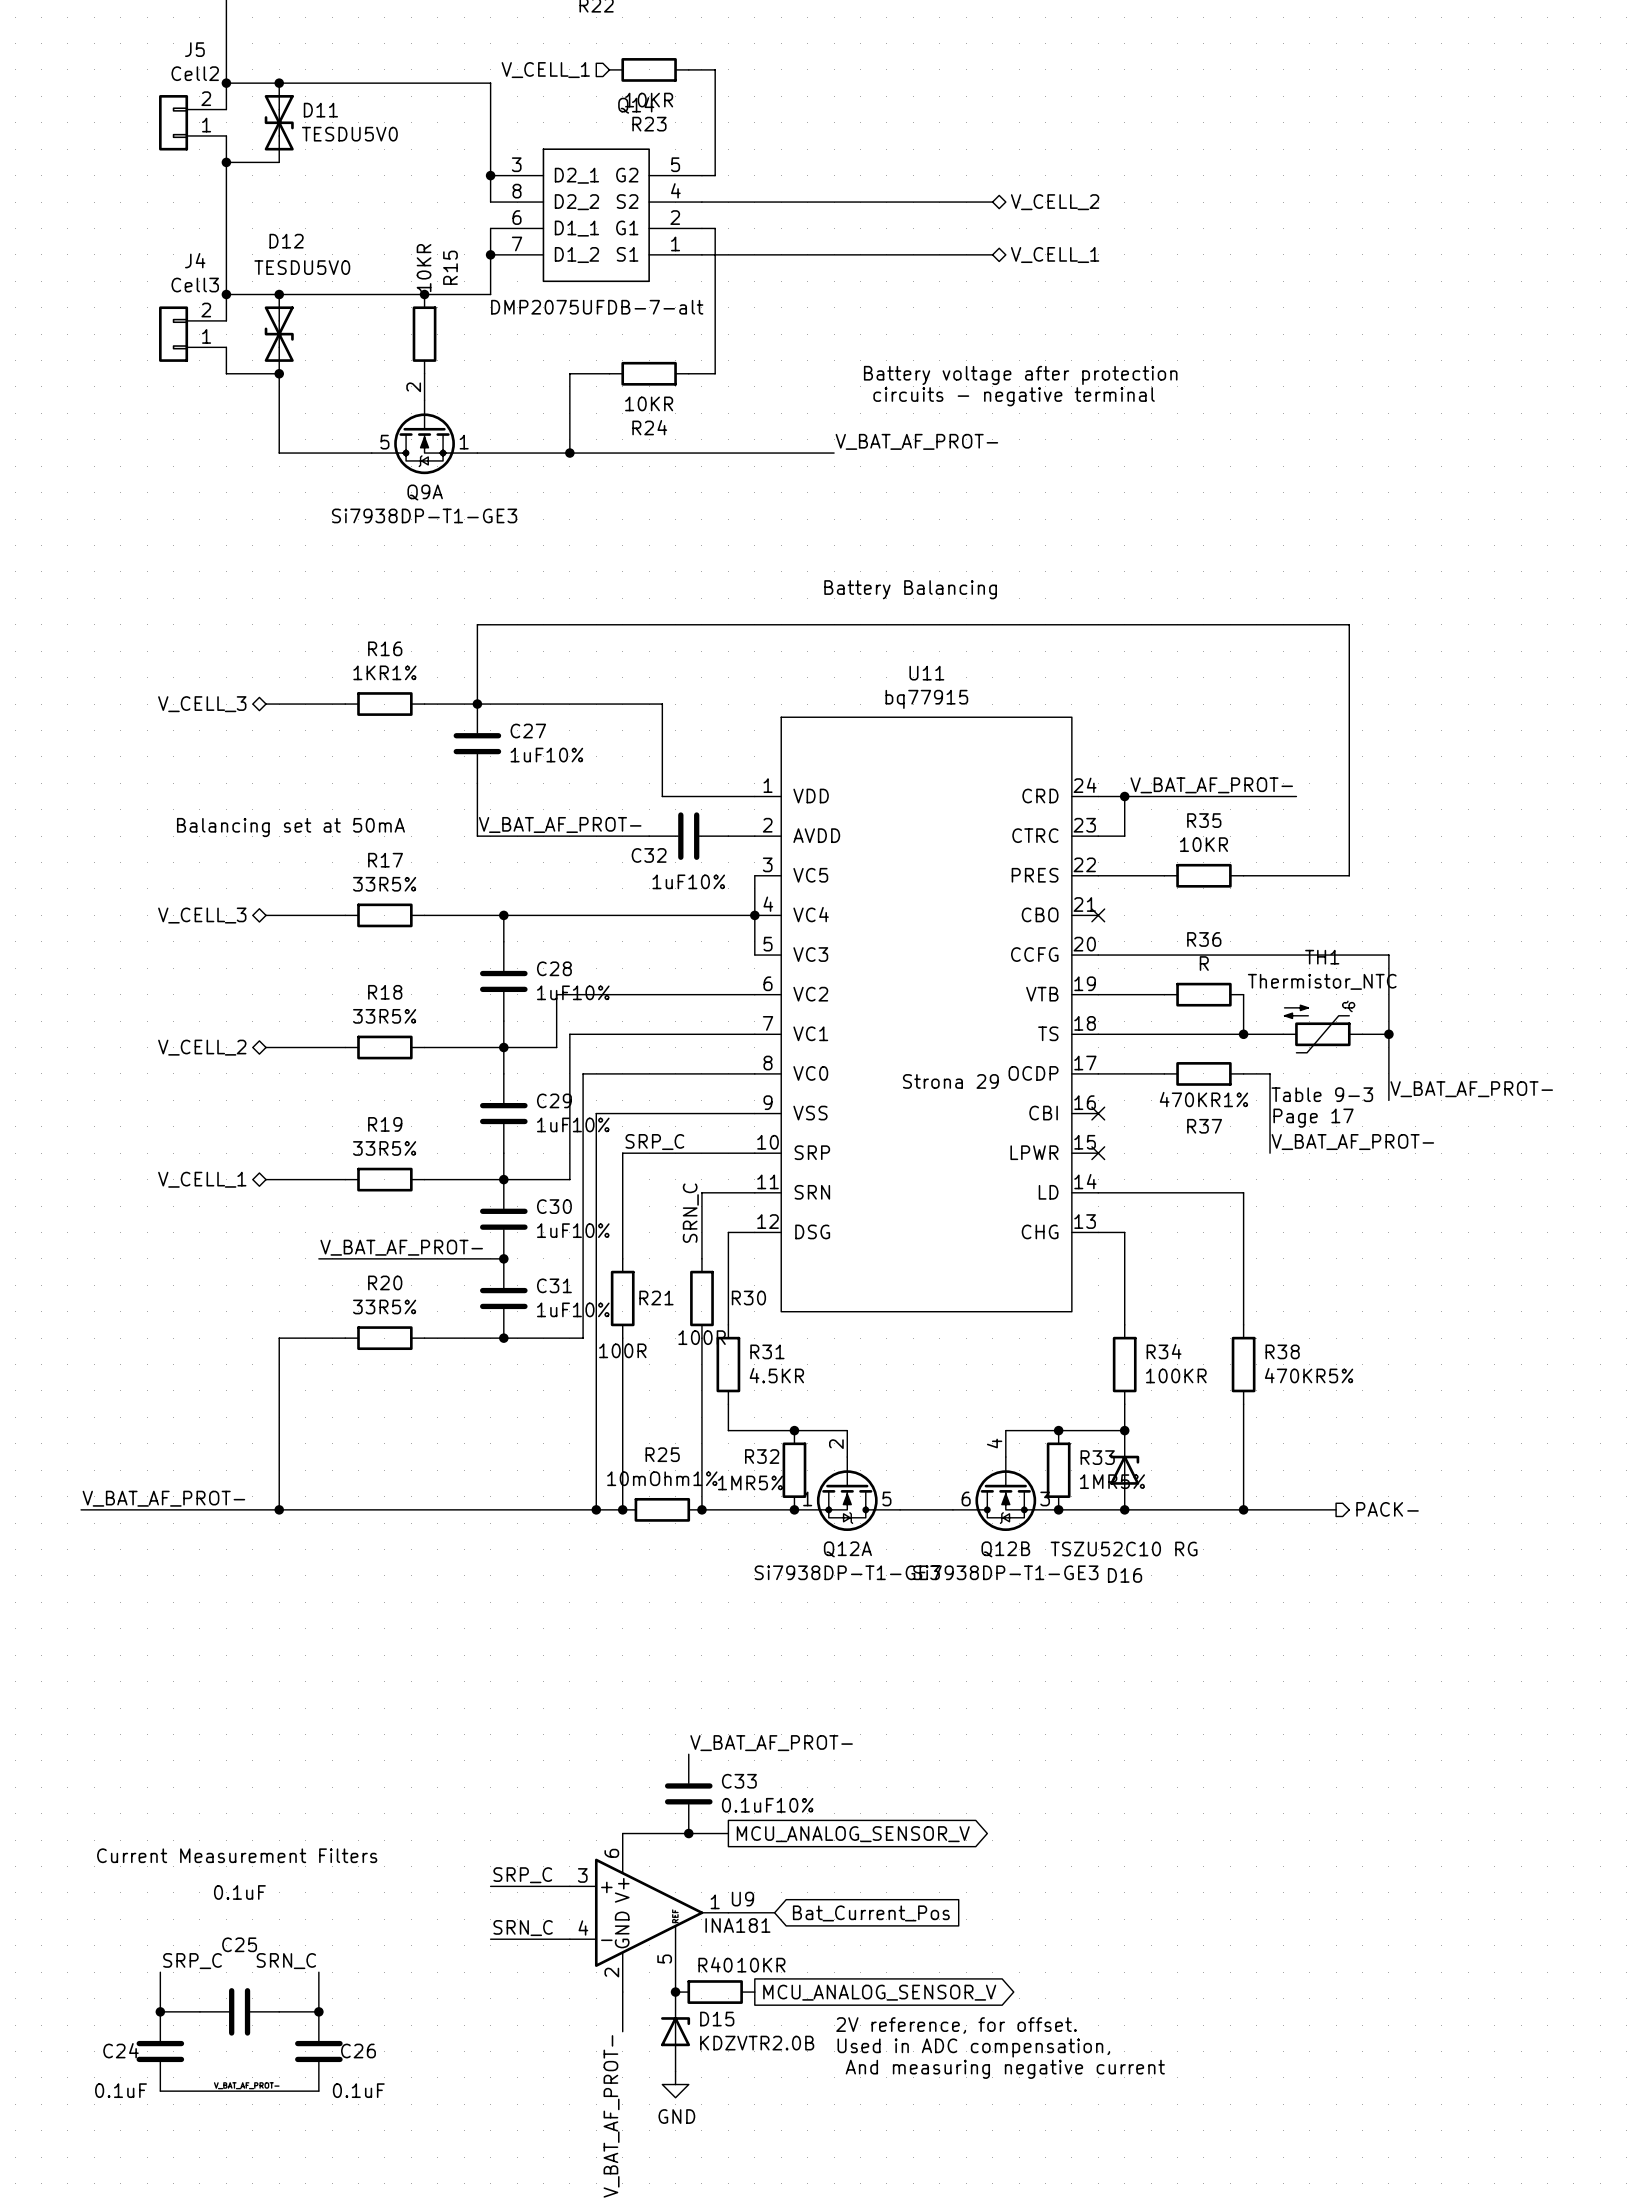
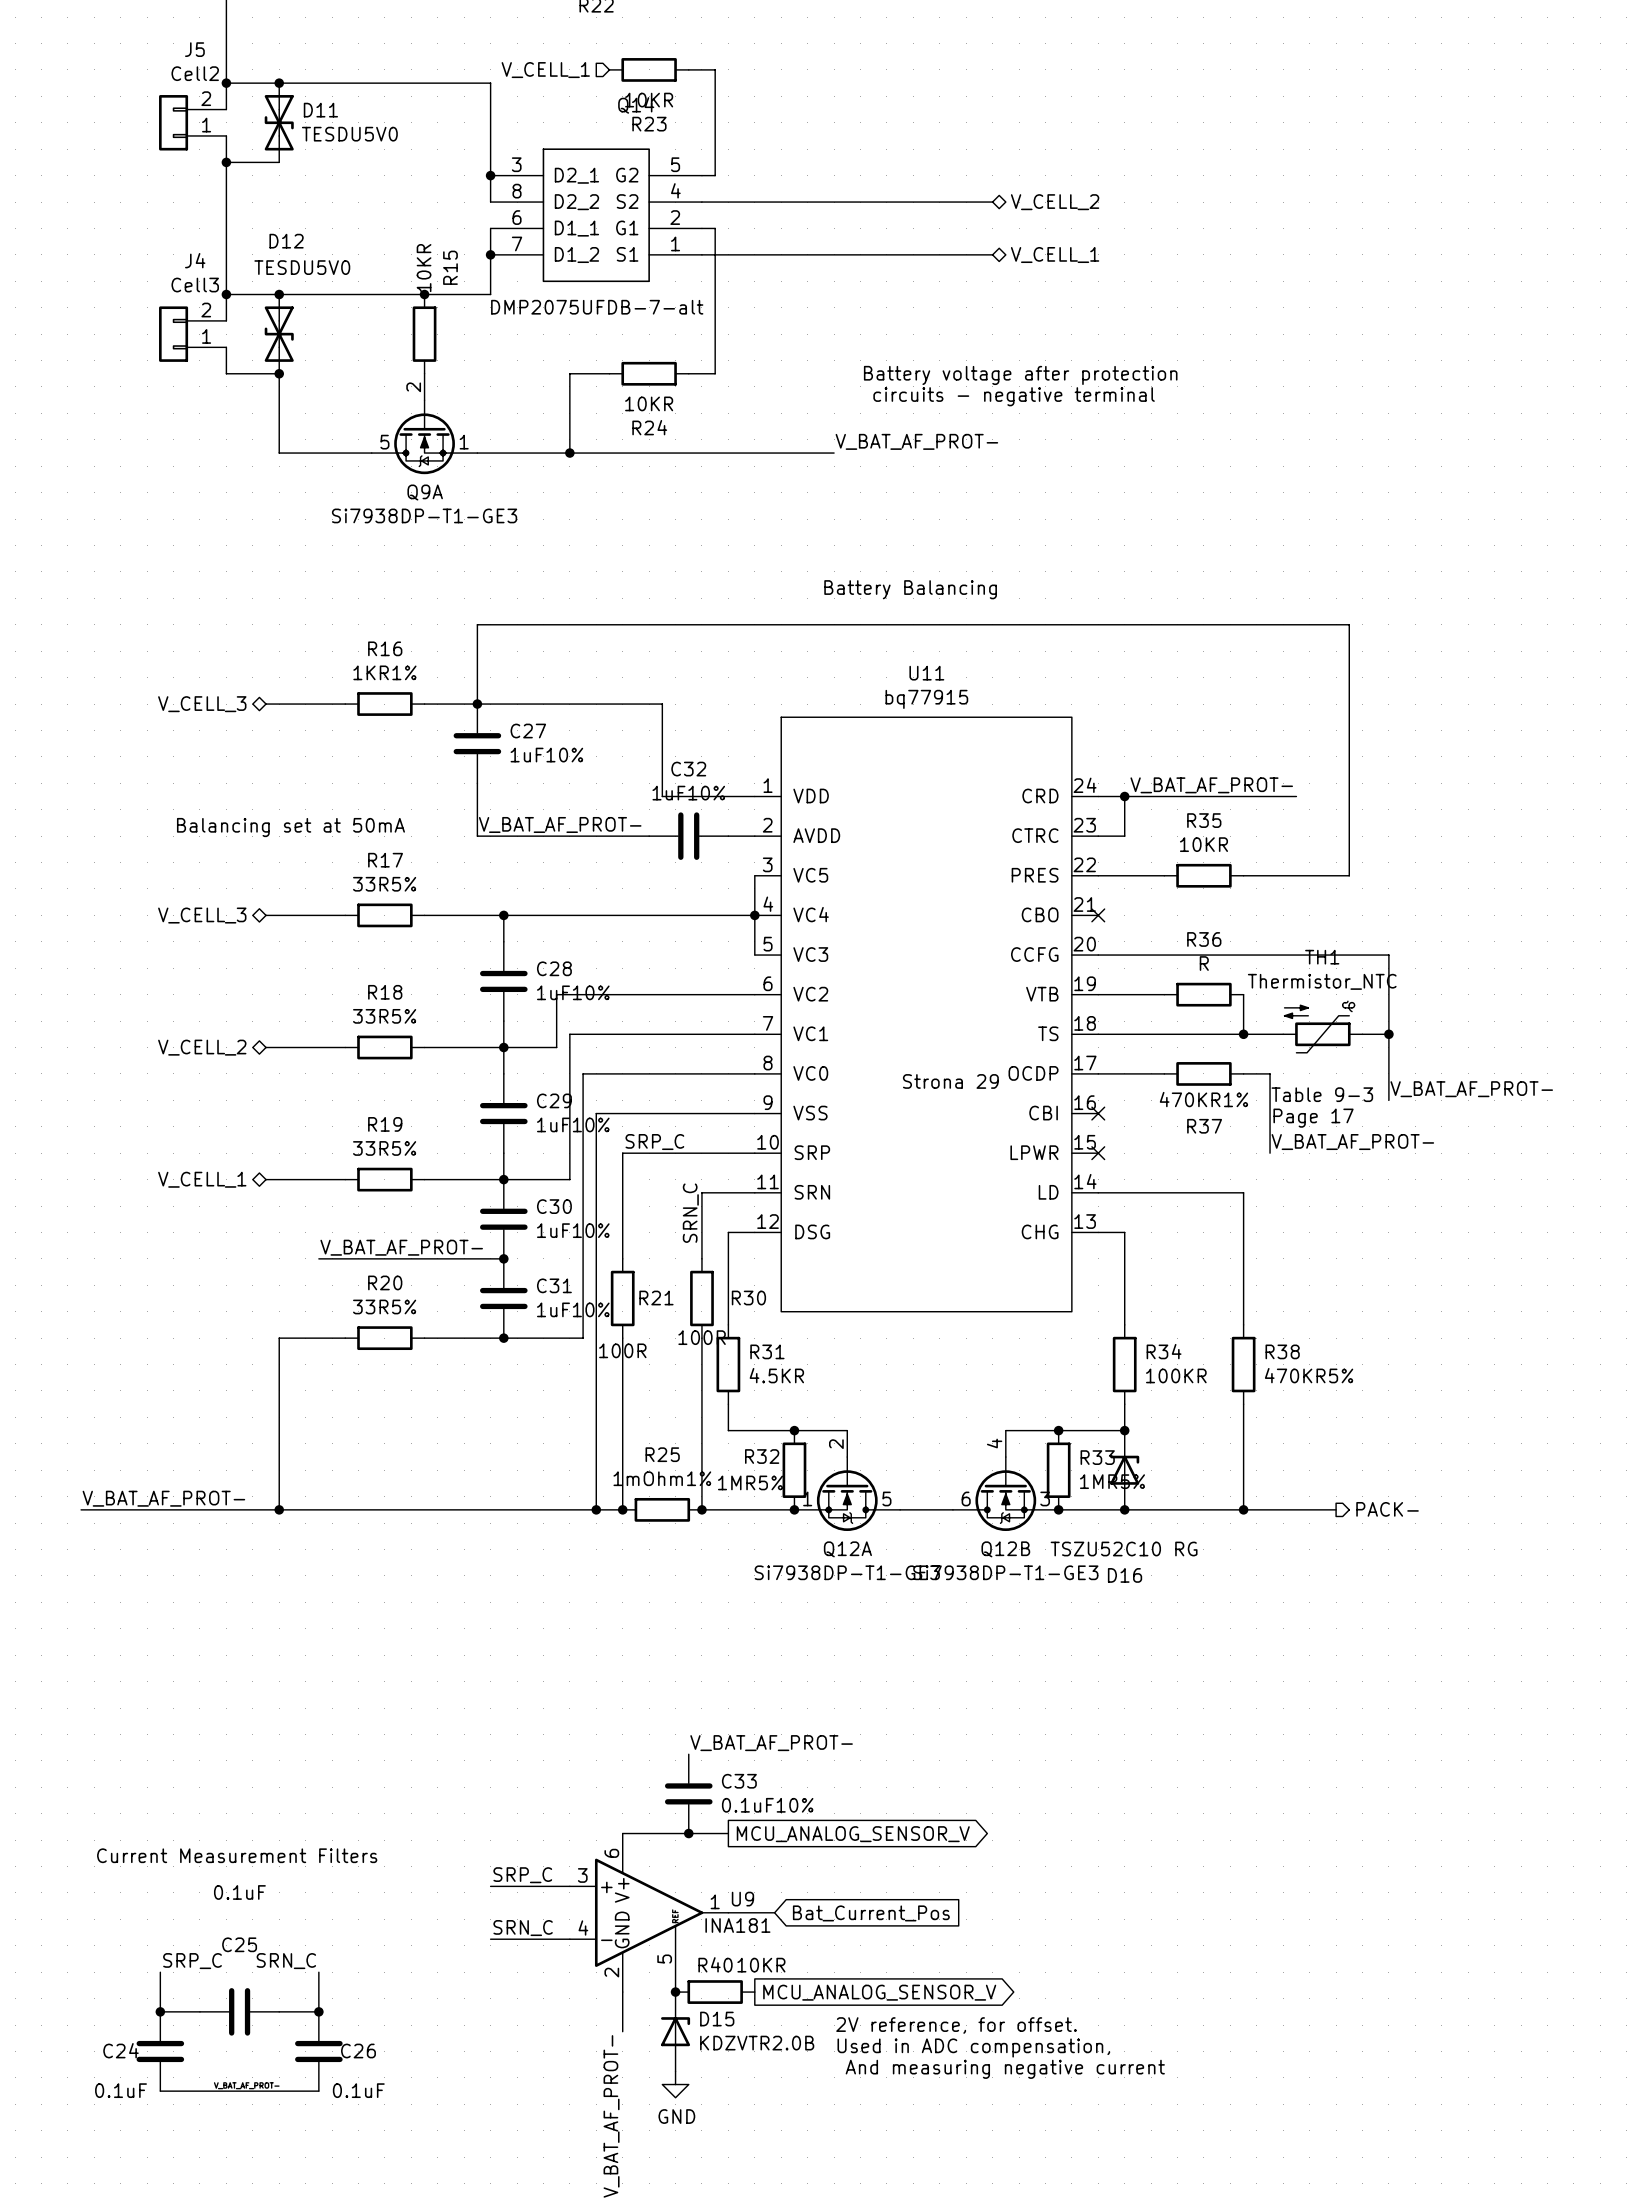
C32 name position: C32 (649, 855) -> C32 (688, 769)
C32 value position: 1uF10% (688, 881) -> 1uF10% (688, 793)
R25 value: 10mOhm1% (662, 1478) -> 1mOhm1% (662, 1478)

